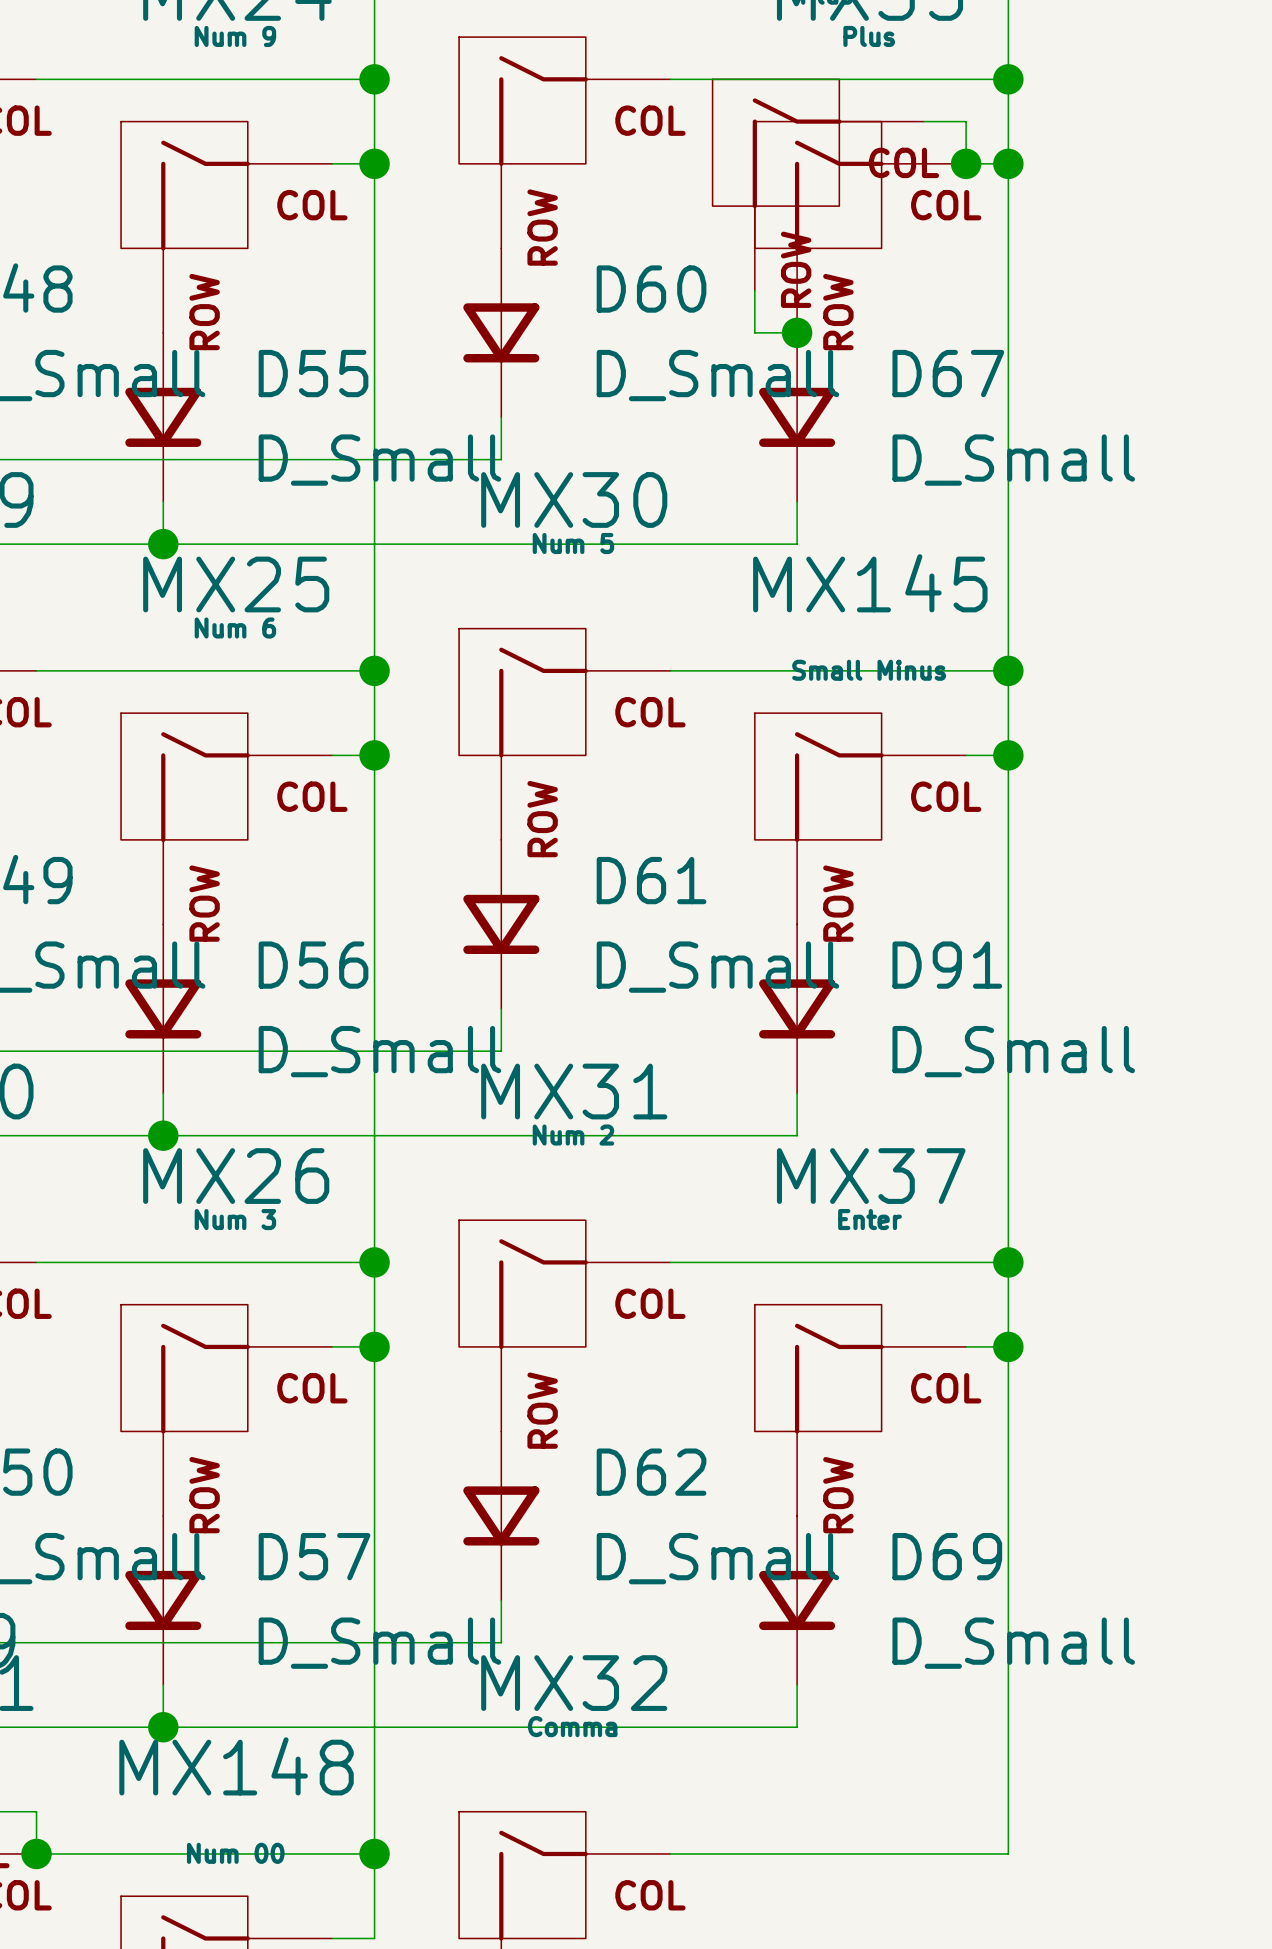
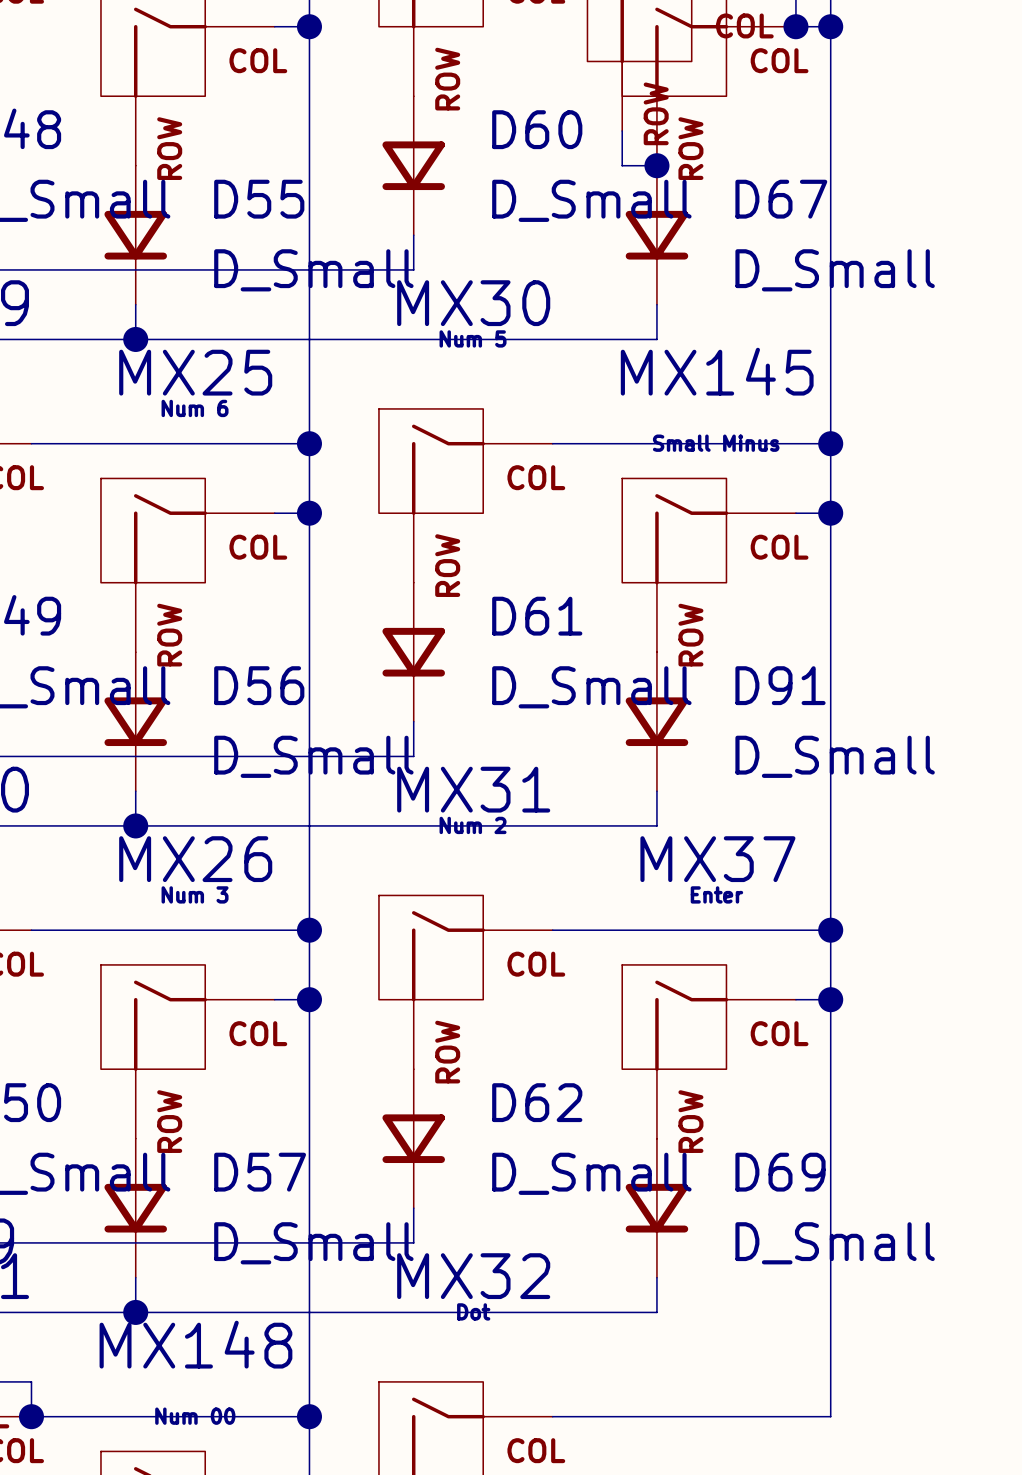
MX32 value: Comma (572, 1726) -> Dot (473, 1311)

